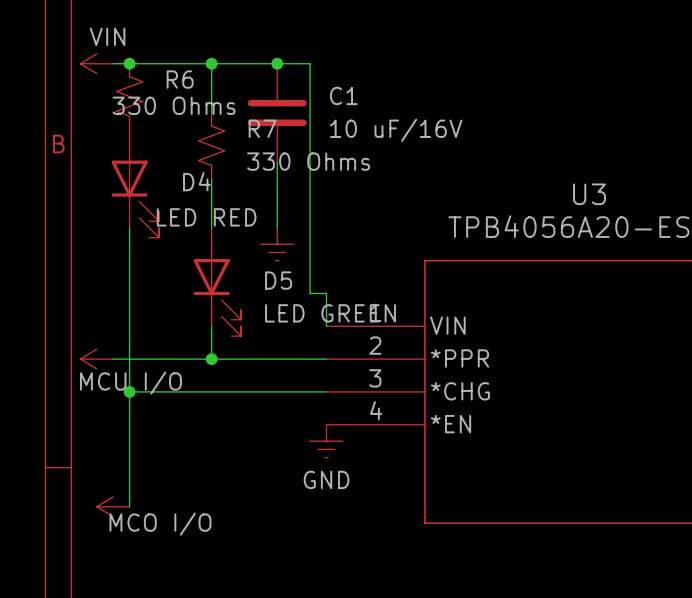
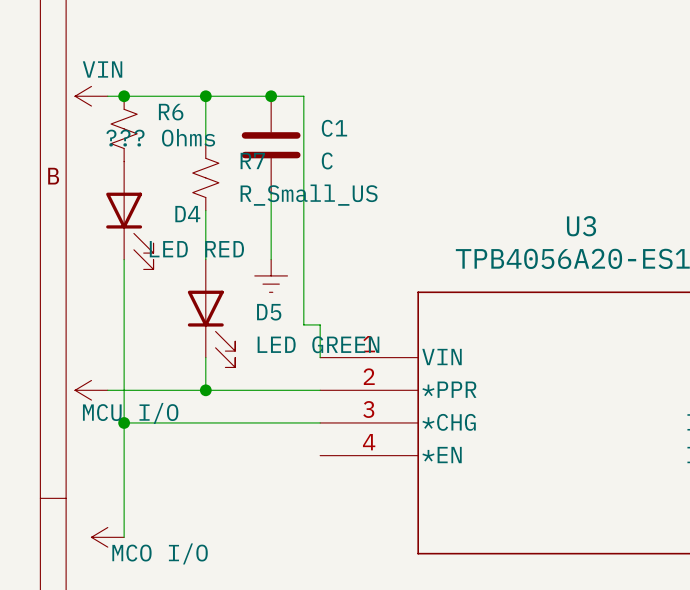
R6 value: 330 Ohms (174, 105) -> ??? Ohms (160, 137)
C1 value: 10 uF/16V (396, 130) -> C (327, 160)
R7 value: 330 Ohms (308, 161) -> R_Small_US (309, 195)
power symbol: GND (326, 441) -> none

